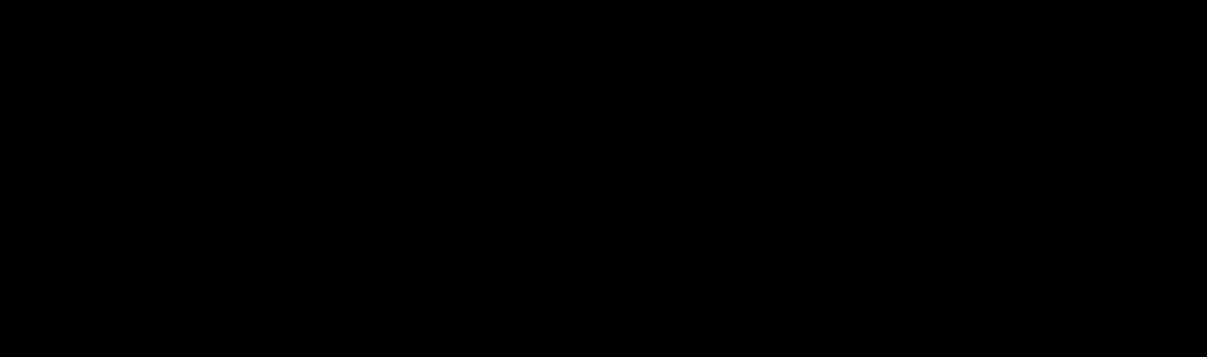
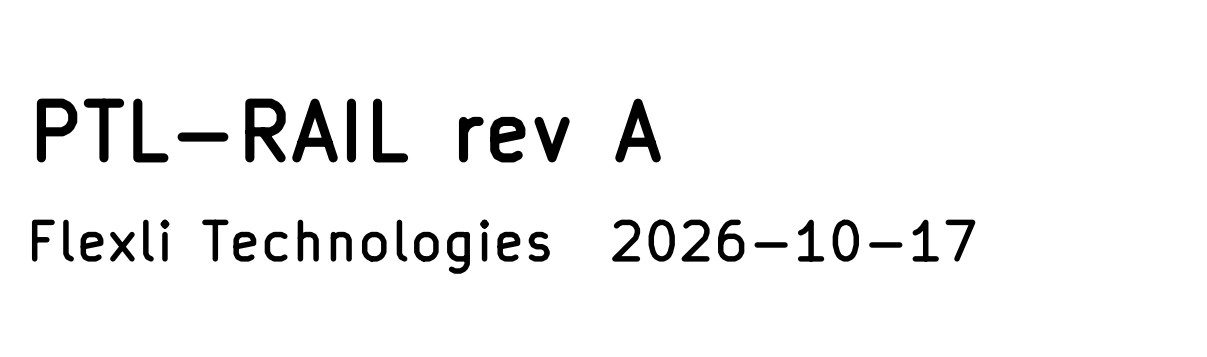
text: none -> PTL-RAIL rev A (348, 130)
text: none -> Flexli Technologies 2026-10-17 (503, 246)

